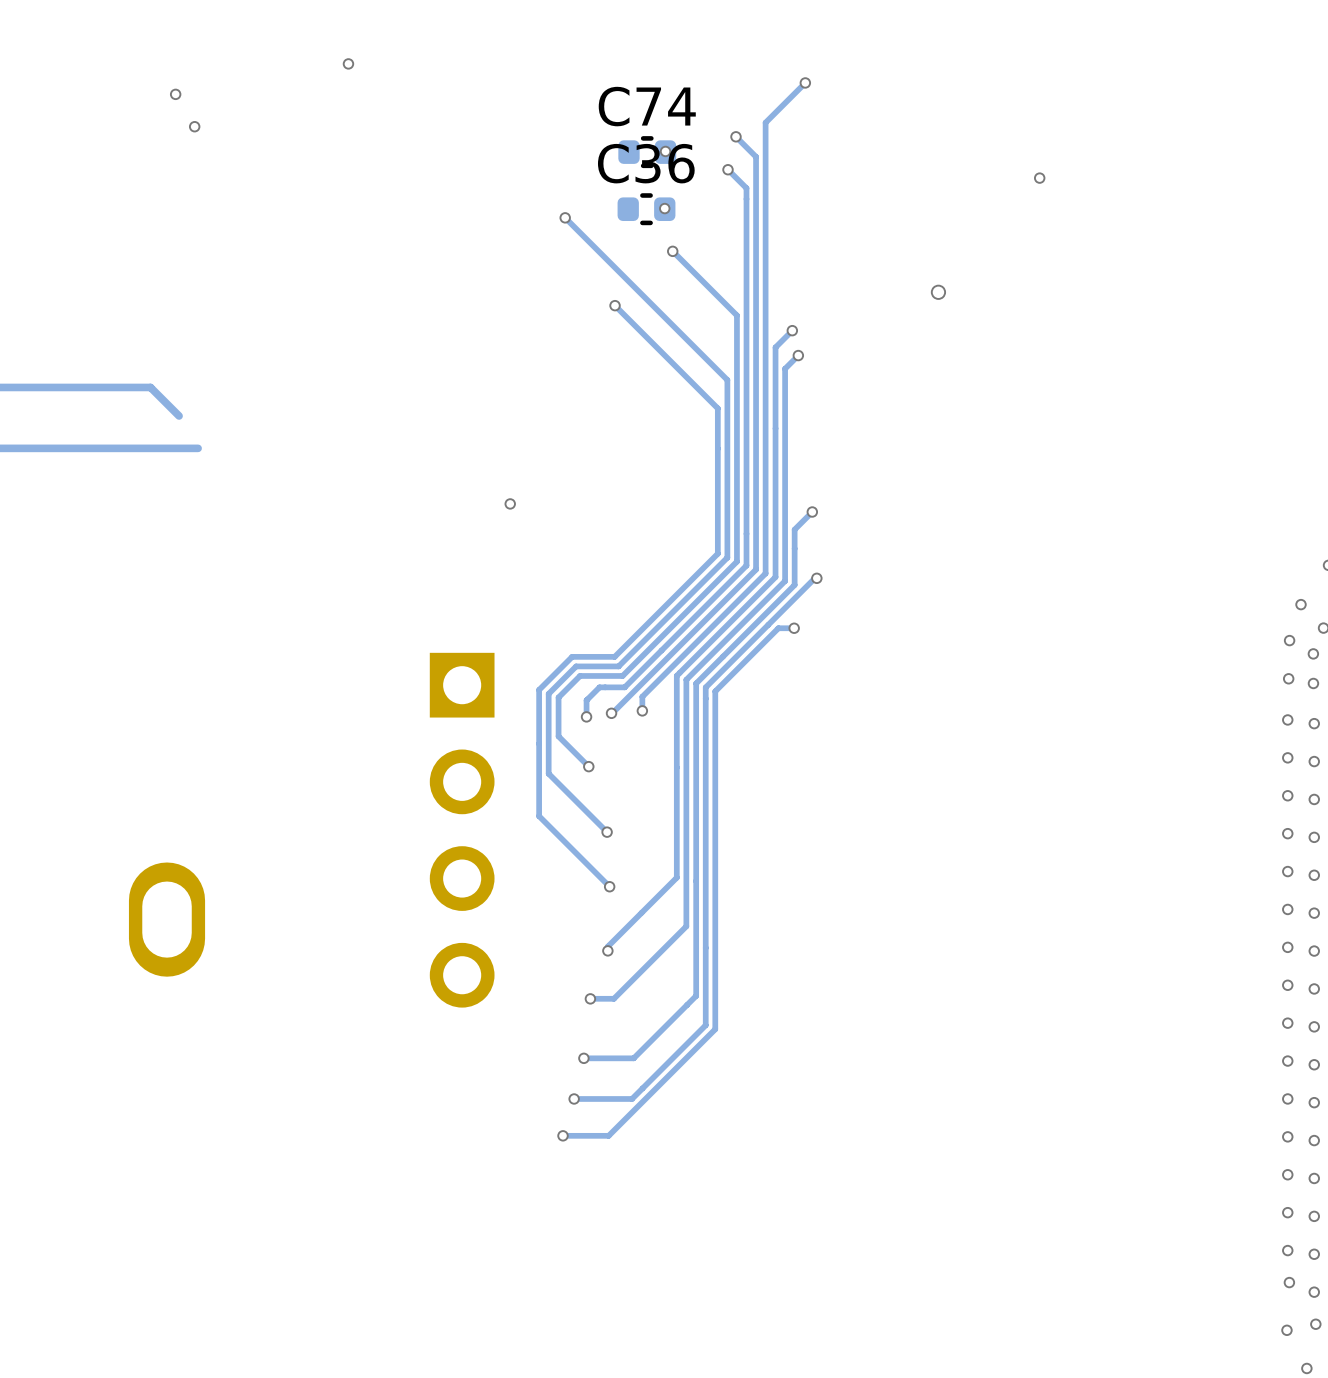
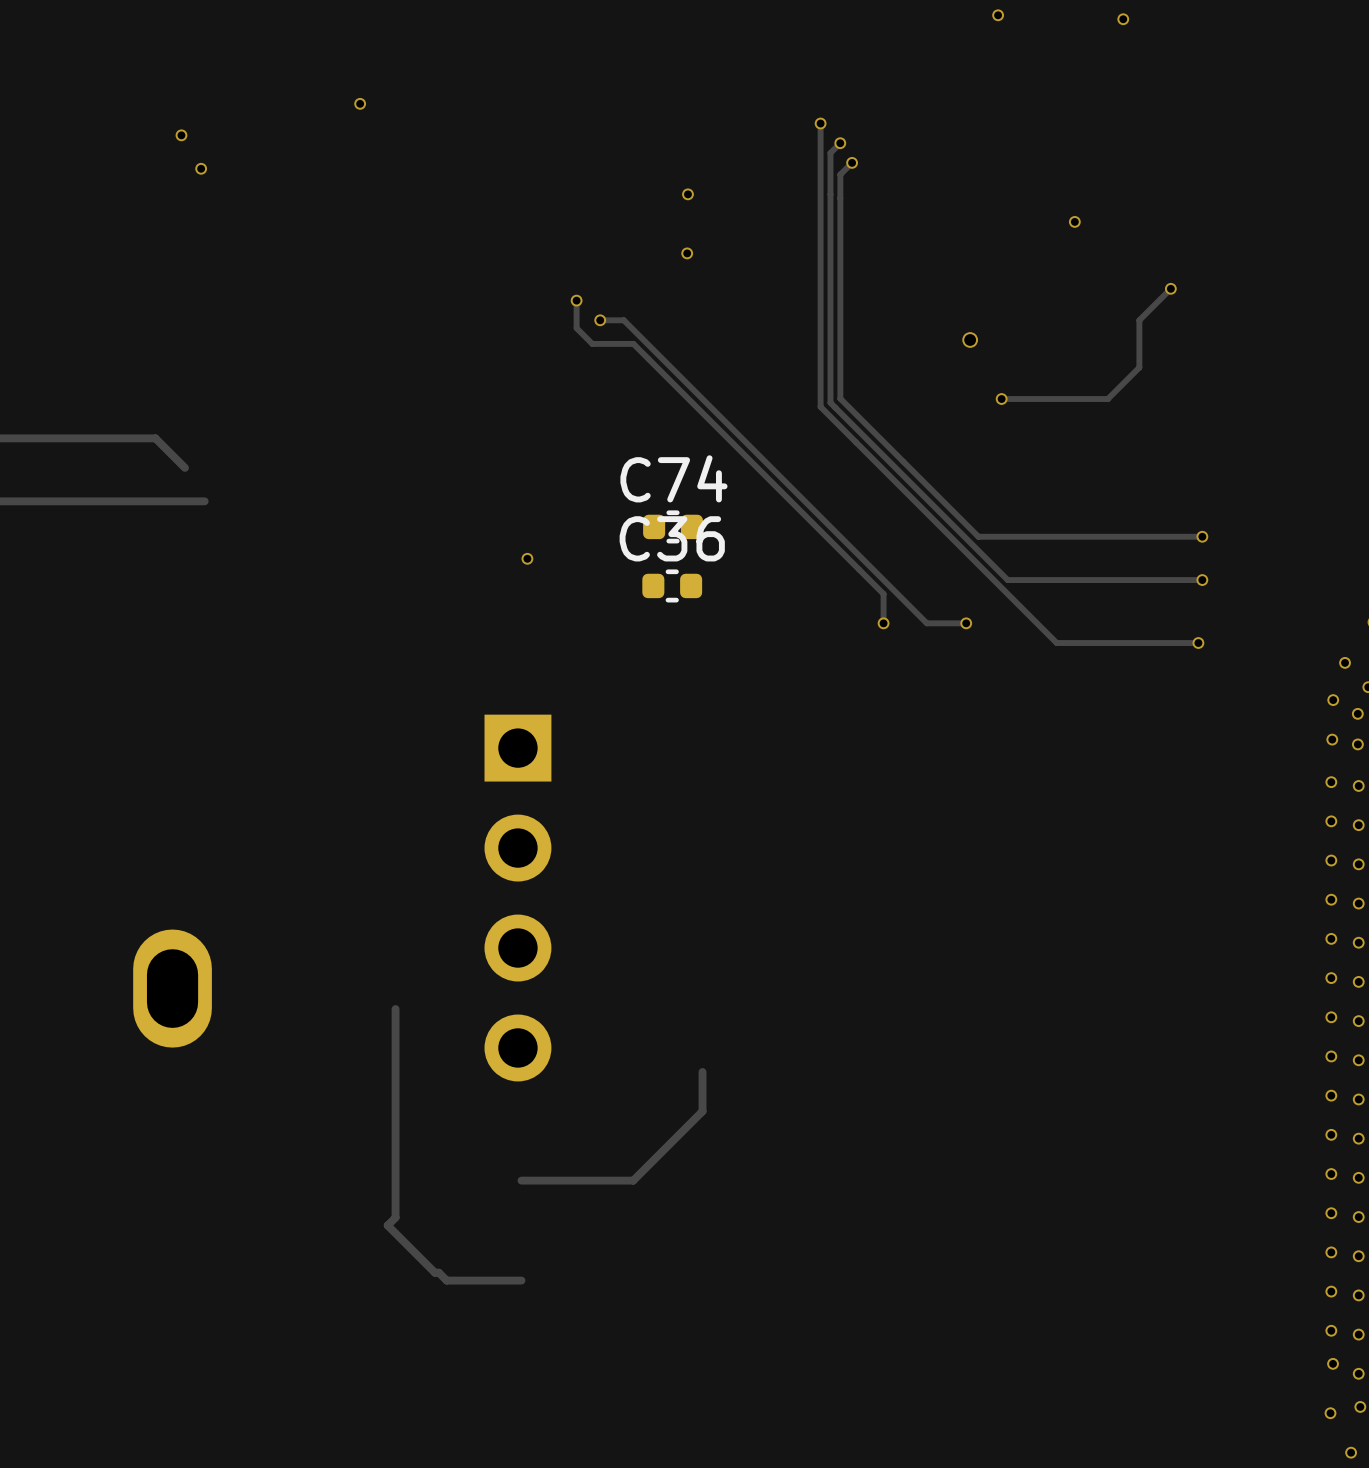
track: none -> (820, 123) (820, 406) (1056, 643) (1198, 643)
via: none -> (820, 123)
track: (805, 82) (765, 122) (765, 573) (642, 696) (642, 710) -> none
via: (805, 82) -> none
track: none -> (840, 143) (830, 153) (830, 402) (1007, 580) (1202, 580)
via: none -> (840, 143)
track: none -> (852, 162) (840, 174) (840, 398) (978, 536) (1202, 536)
via: none -> (852, 162)
track: (735, 136) (756, 156) (756, 569) (611, 713) -> none
via: (735, 136) -> none
C74 position: (647, 152) -> (673, 526)
track: (727, 169) (746, 188) (746, 565) (624, 687) (599, 687) (586, 700) (586, 716) -> none
via: (727, 169) -> none
C36 position: (646, 209) -> (672, 585)
track: (565, 217) (727, 380) (727, 557) (618, 666) (576, 666) (548, 693) (548, 773) (607, 832) -> none
via: (565, 217) -> none
track: none -> (1170, 288) (1139, 320) (1139, 367) (1107, 399) (1001, 399)
via: none -> (1170, 288)
track: (672, 251) (736, 315) (736, 561) (622, 675) (580, 675) (558, 697) (558, 736) (588, 766) -> none
via: (672, 251) -> none
track: none -> (576, 300) (576, 328) (592, 343) (633, 343) (883, 594) (883, 623)
via: none -> (576, 300)
track: none -> (600, 320) (623, 320) (926, 623) (966, 623)
via: none -> (600, 320)
track: (615, 305) (717, 408) (717, 553) (614, 656) (572, 656) (539, 689) (539, 816) (609, 886) -> none
via: (615, 305) -> none
track: (792, 330) (775, 347) (775, 577) (676, 675) (676, 877) (607, 946) (607, 950) -> none
via: (792, 330) -> none
via: none -> (1001, 399)
track: (798, 355) (785, 368) (785, 581) (686, 679) (686, 926) (613, 998) (590, 998) -> none
via: (798, 355) -> none
via: none -> (1202, 536)
track: (812, 512) (794, 529) (794, 585) (696, 683) (696, 995) (633, 1058) (583, 1058) -> none
via: (812, 512) -> none
via: none -> (1202, 580)
via: none -> (883, 623)
via: none -> (966, 623)
track: (816, 578) (705, 687) (705, 1025) (632, 1098) (574, 1098) -> none
via: (816, 578) -> none
via: none -> (1198, 643)
track: (794, 628) (778, 628) (715, 691) (715, 1029) (608, 1135) (562, 1135) -> none
via: (794, 628) -> none
via: (642, 710) -> none
via: (611, 713) -> none
via: (586, 716) -> none
via: (588, 766) -> none
part position: (462, 830) -> (517, 898)
via: (607, 832) -> none
via: (609, 886) -> none
track: none -> (395, 1009) (395, 1217) (387, 1225) (434, 1272) (438, 1272) (446, 1280) (521, 1280)
via: (607, 950) -> none
via: (590, 998) -> none
track: none -> (702, 1071) (702, 1111) (633, 1180) (521, 1180)
via: (583, 1058) -> none
via: (574, 1098) -> none
via: (562, 1135) -> none

